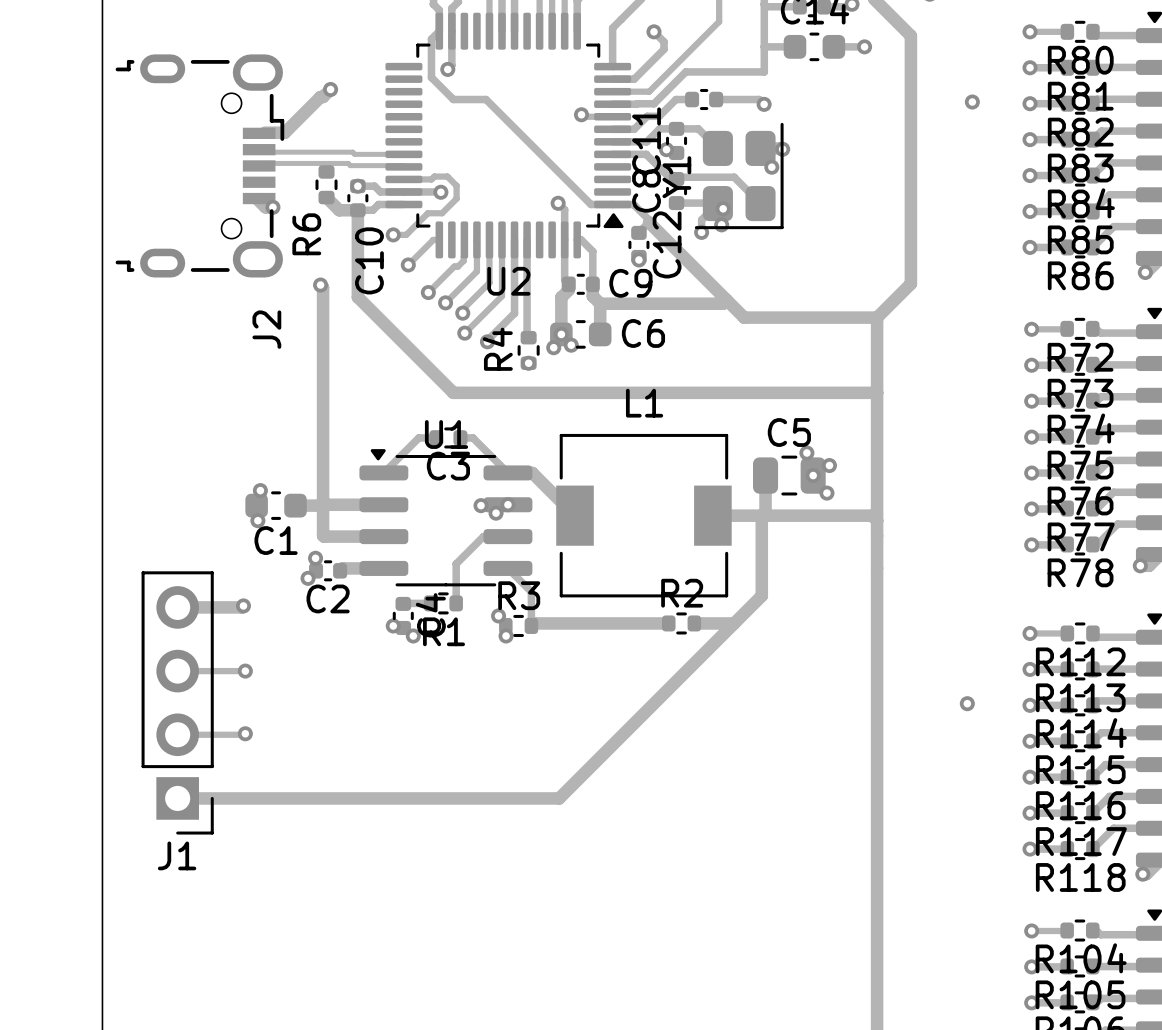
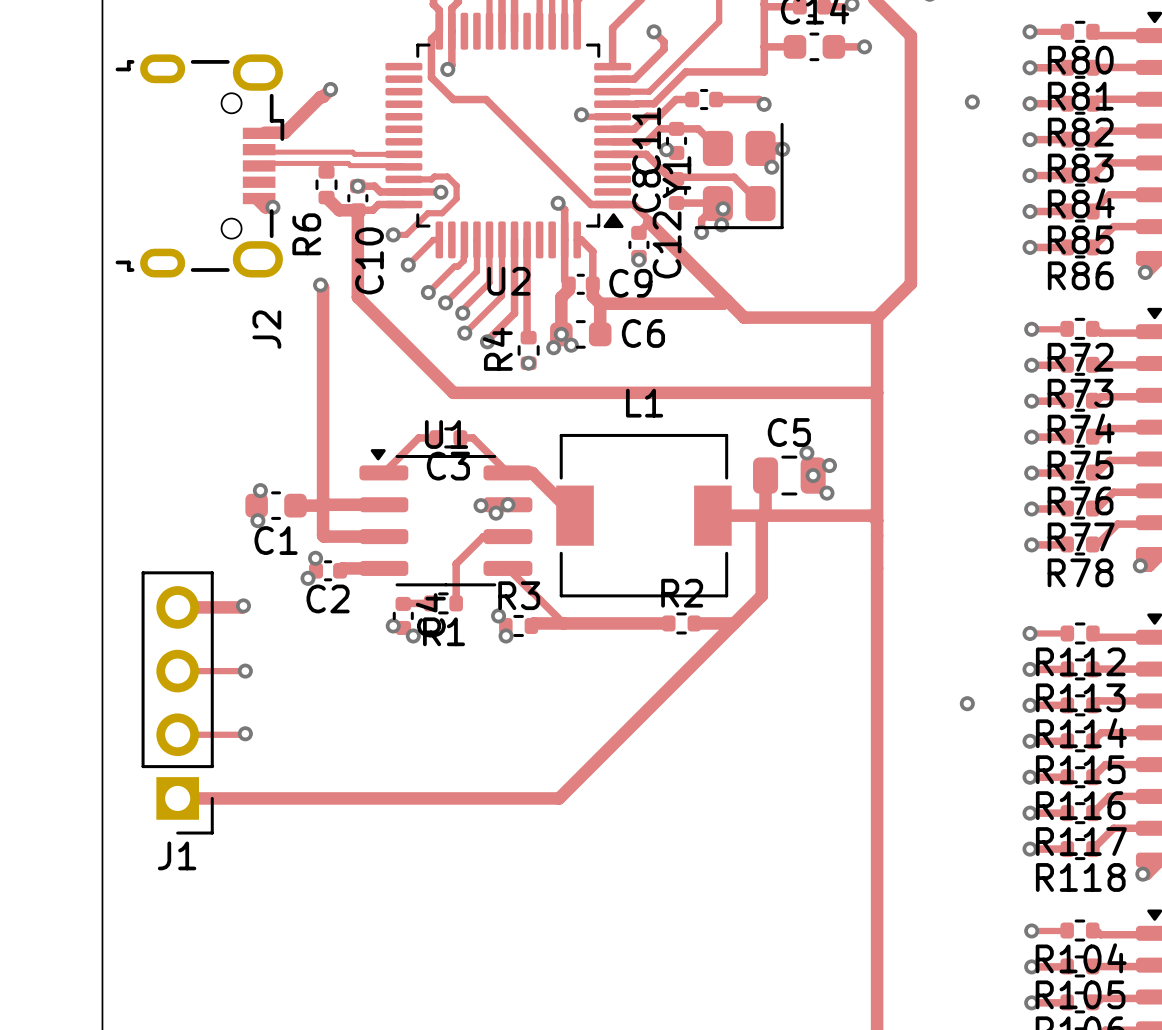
track: (531, 591) (531, 625) -> (531, 591) (563, 623)

